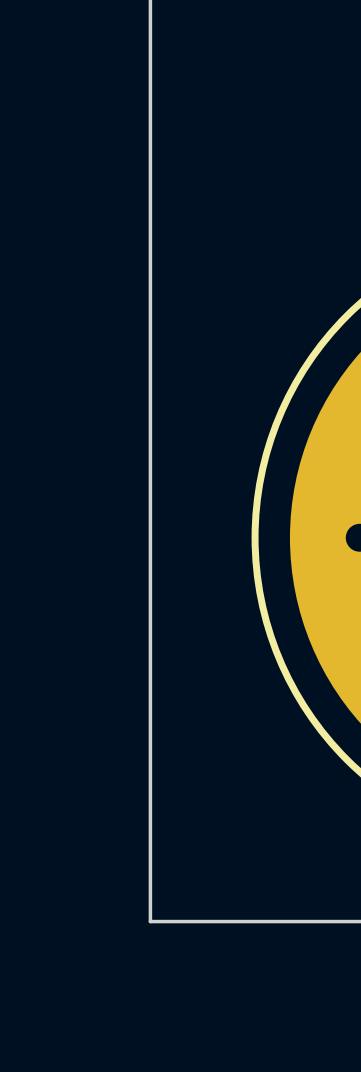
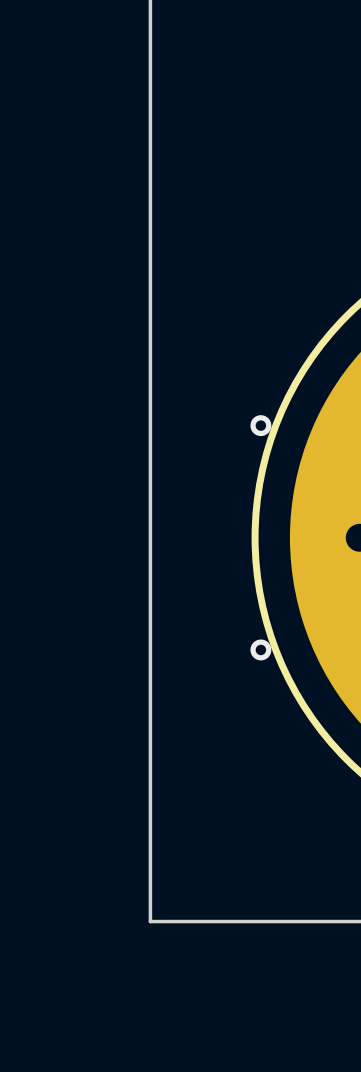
via: none -> (260, 425)
via: none -> (260, 649)

